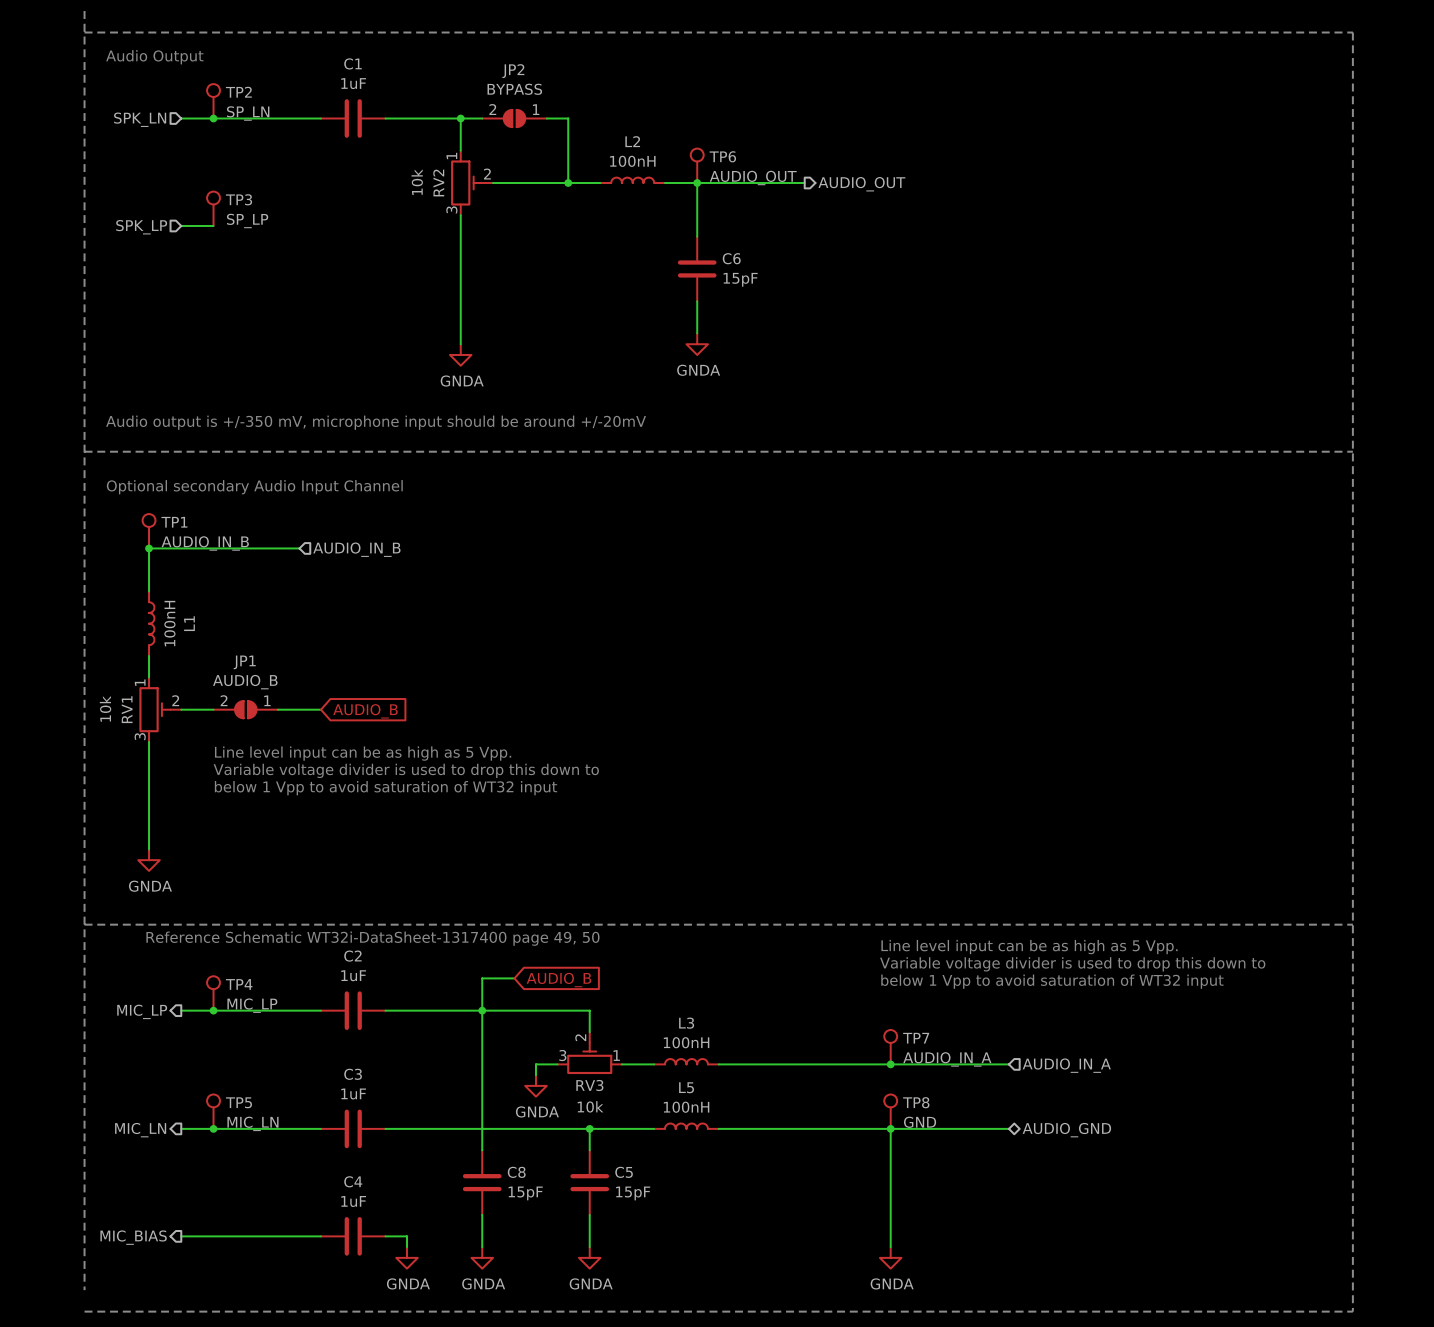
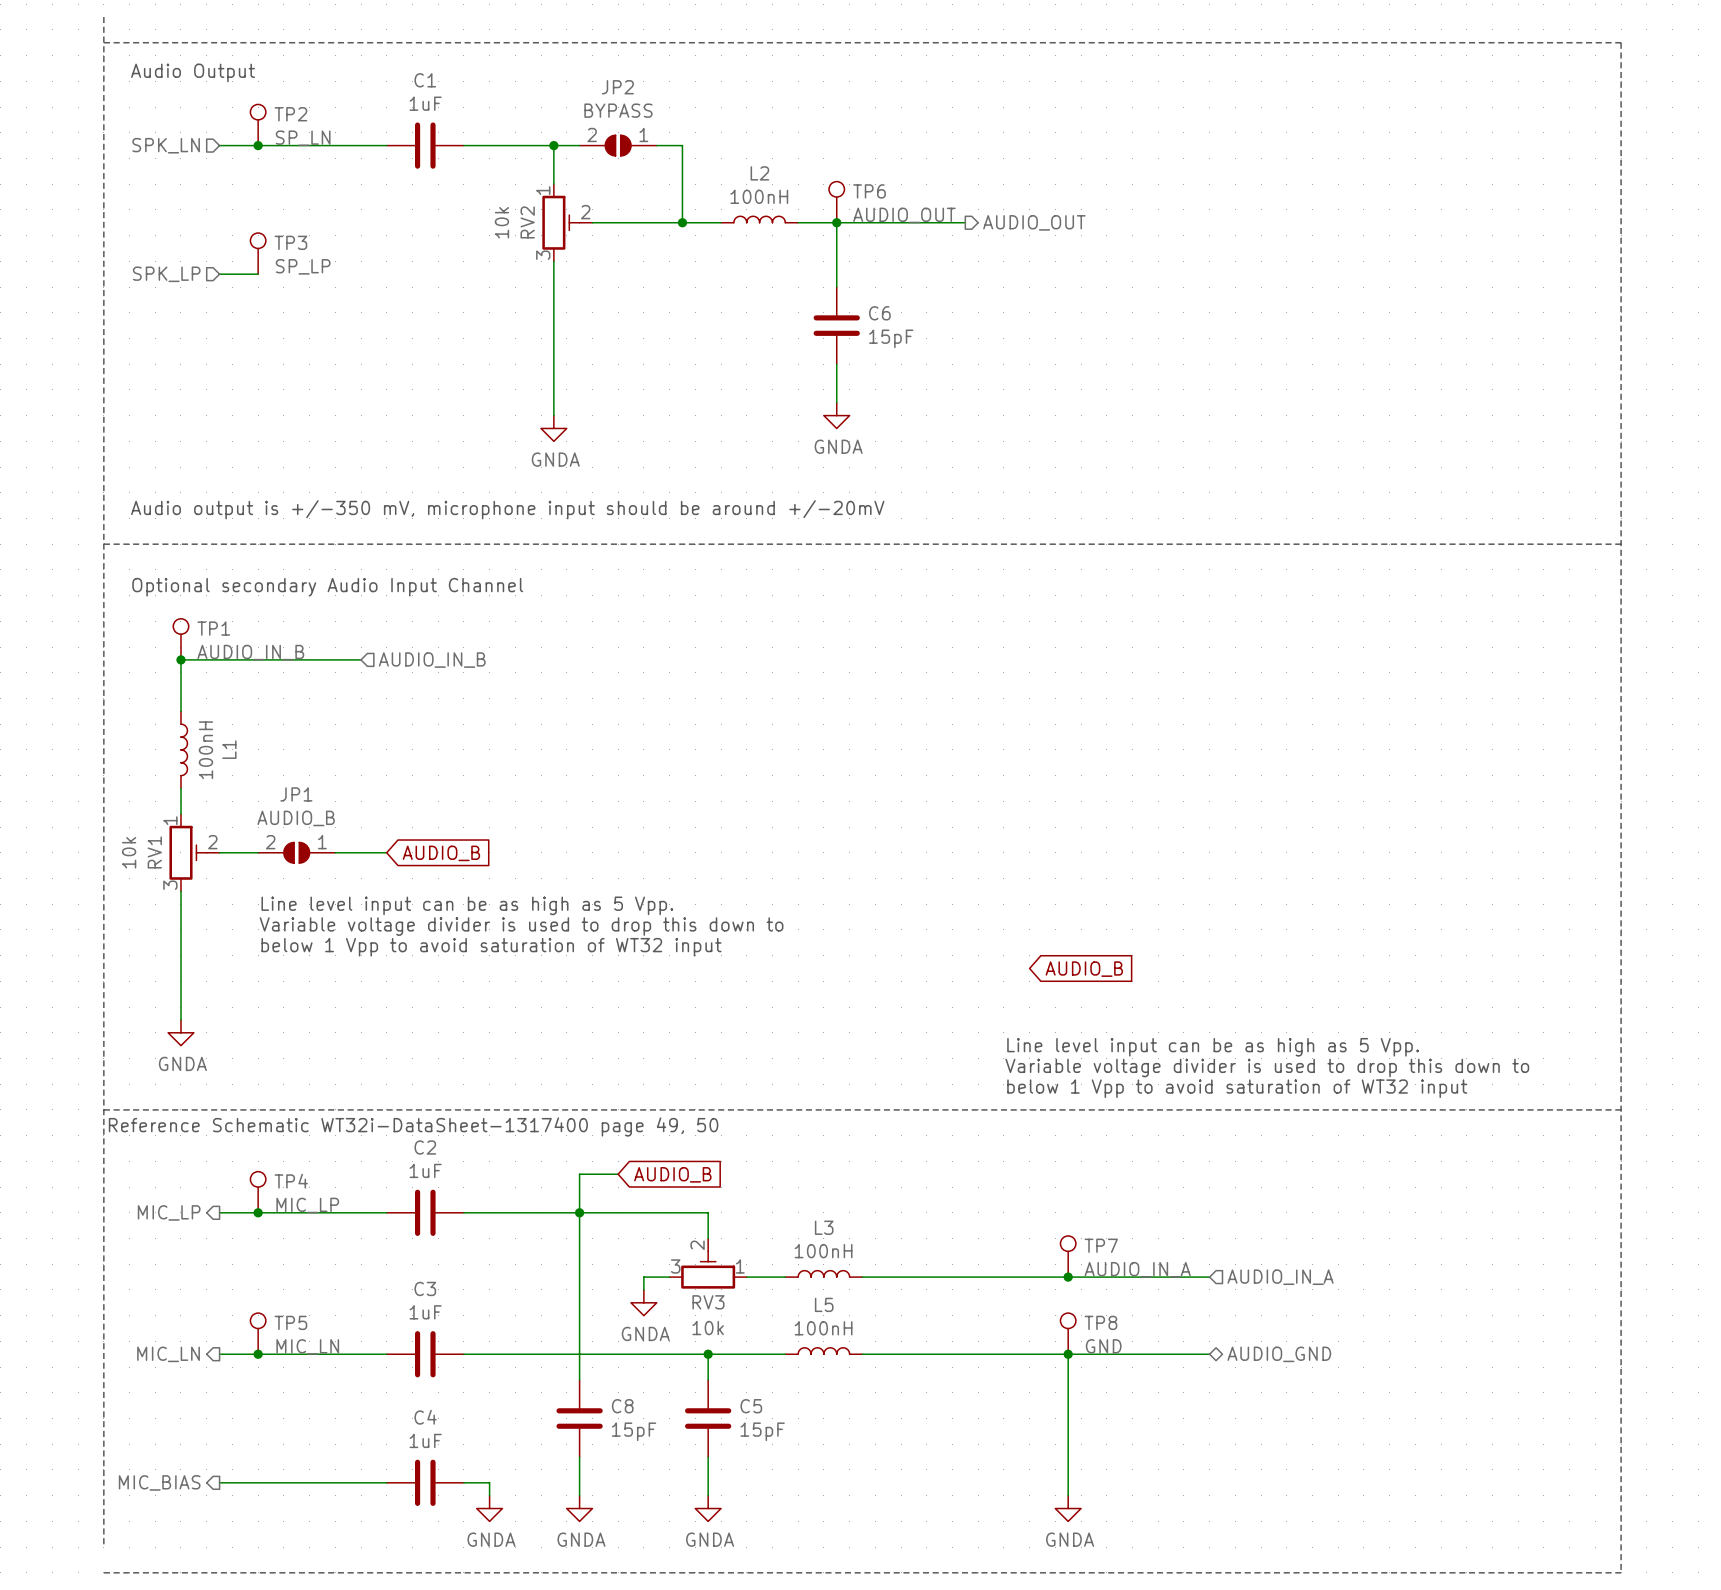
global label: none -> AUDIO_B (1084, 969)
text position: Line level input can be as high as 5 Vpp. (1029, 947) -> Line level input can be as high as 5 Vpp. (1213, 1047)
text position: Variable voltage divider is used to drop this down to (1072, 964) -> Variable voltage divider is used to drop this down to (1267, 1067)
text position: below 1 Vpp to avoid saturation of WT32 input (1052, 981) -> below 1 Vpp to avoid saturation of WT32 input (1237, 1088)

